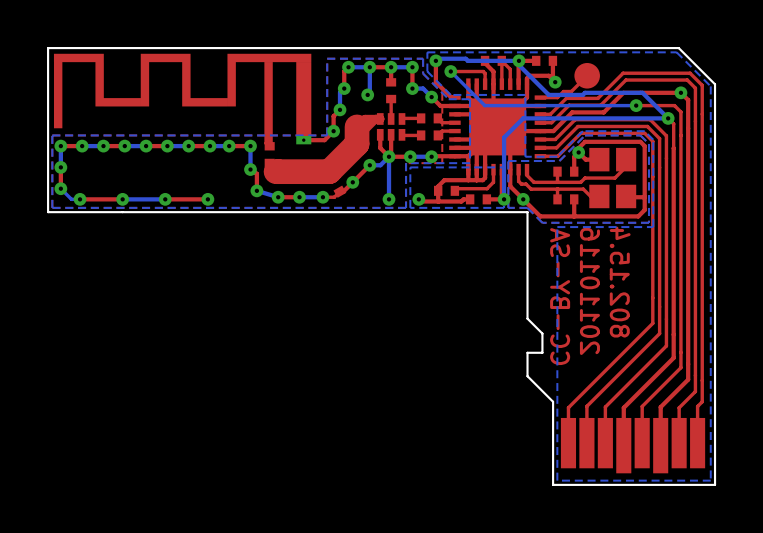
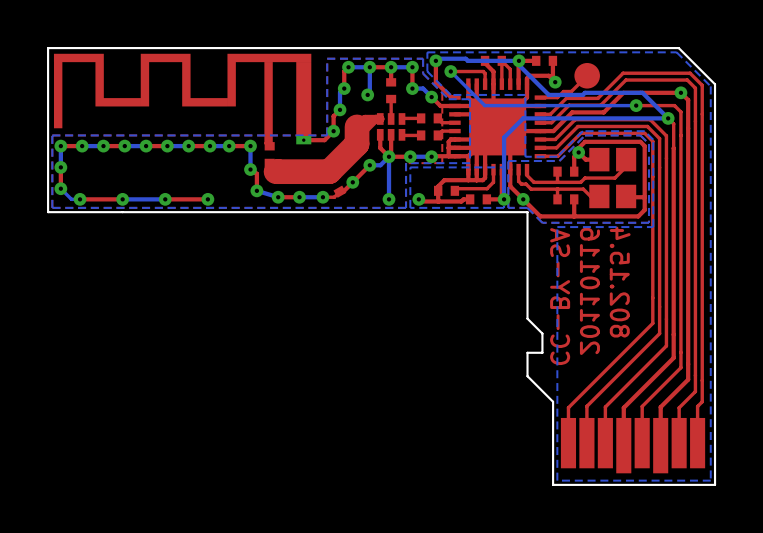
top track: none -> (454, 139) (448, 141) (448, 156)

